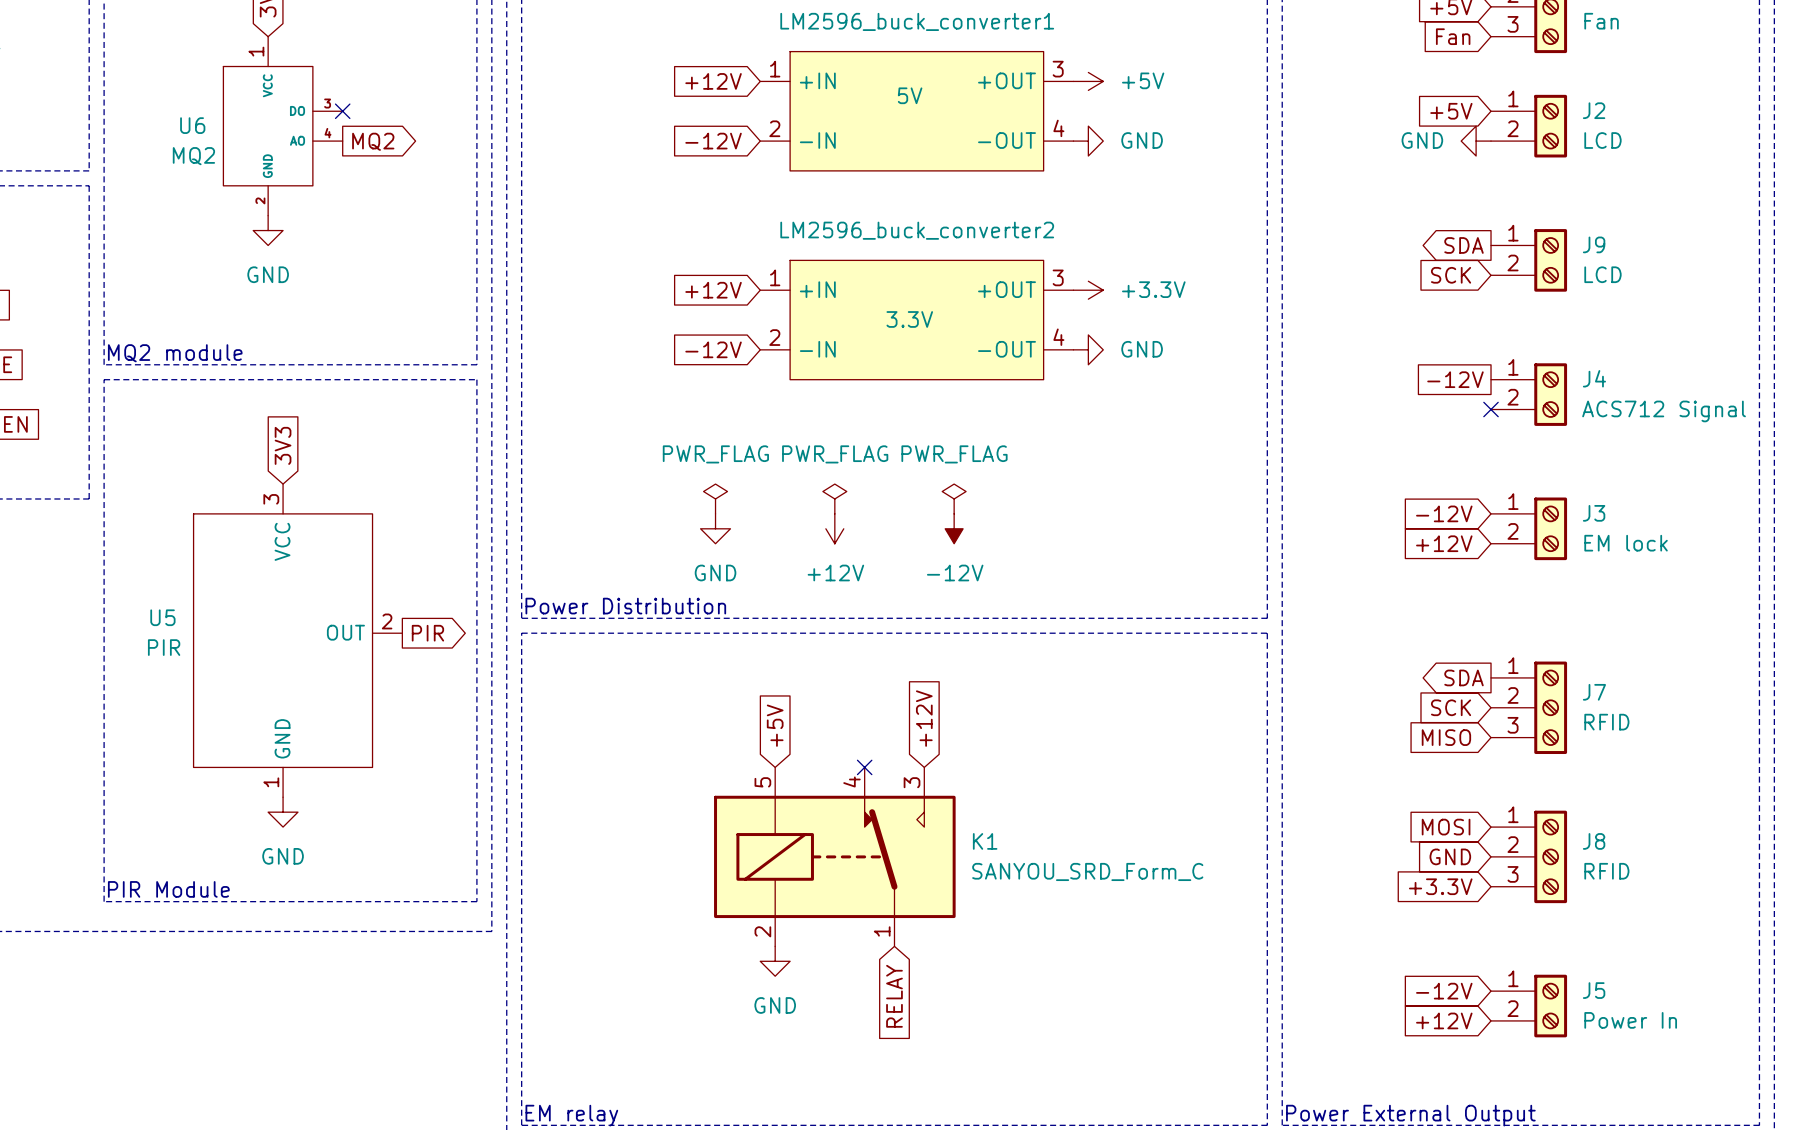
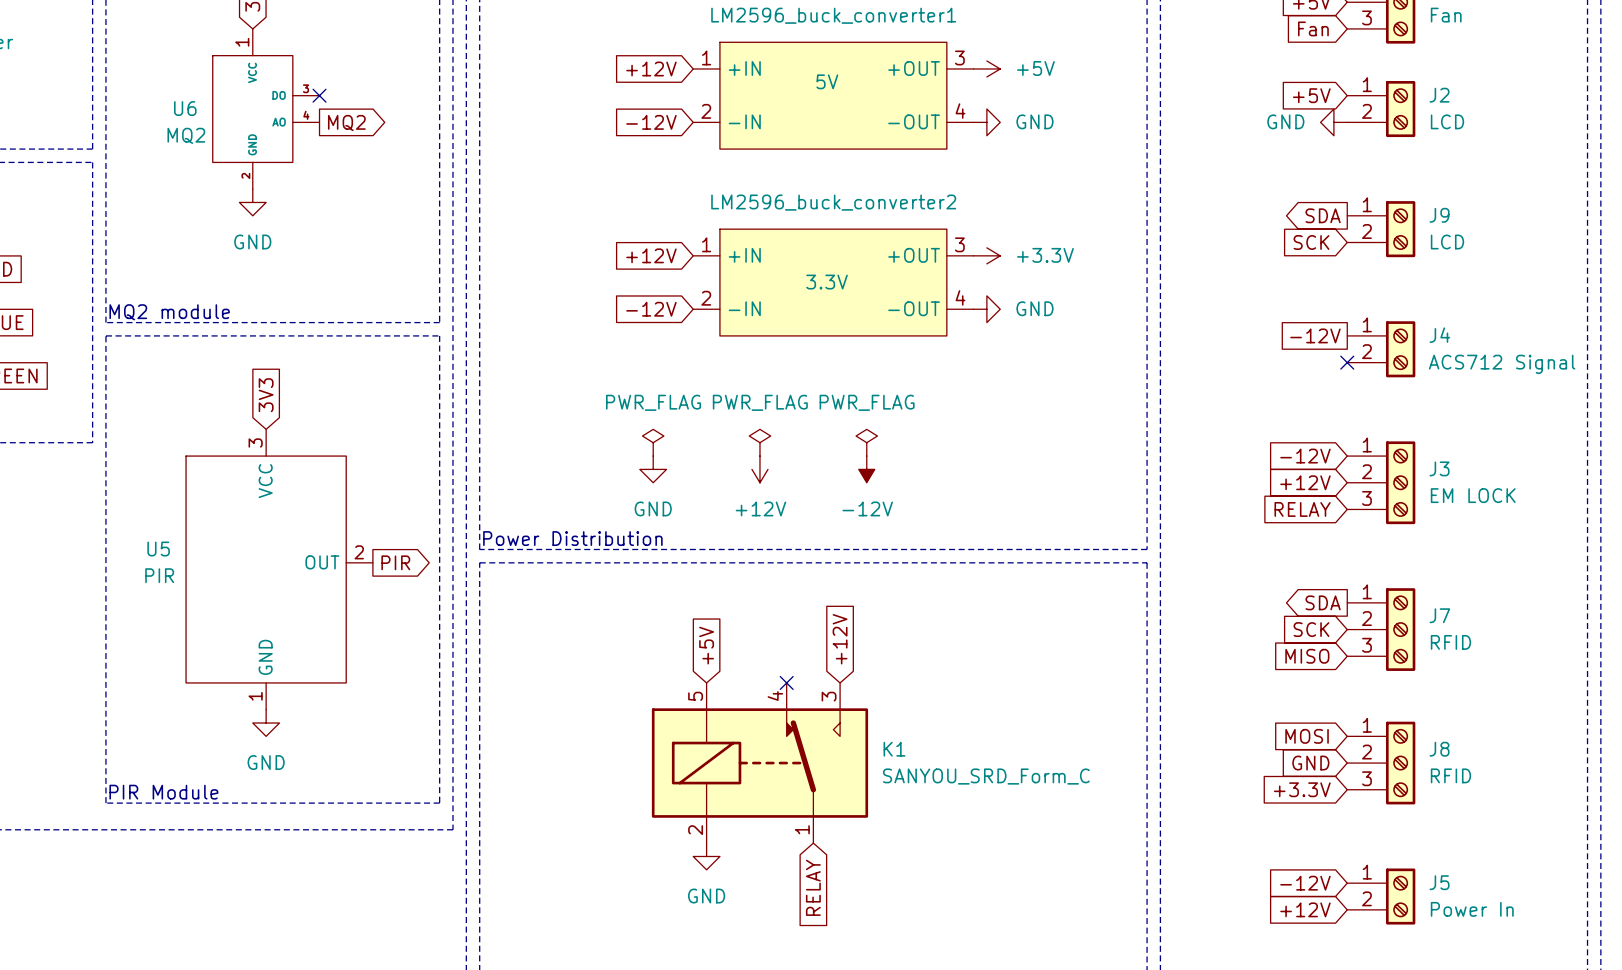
J3 symbol: [1491, 497, 1568, 561] -> [1347, 441, 1416, 525]
J3 value: EM lock (1626, 543) -> EM LOCK (1473, 495)
global label: none -> RELAY (1302, 509)

